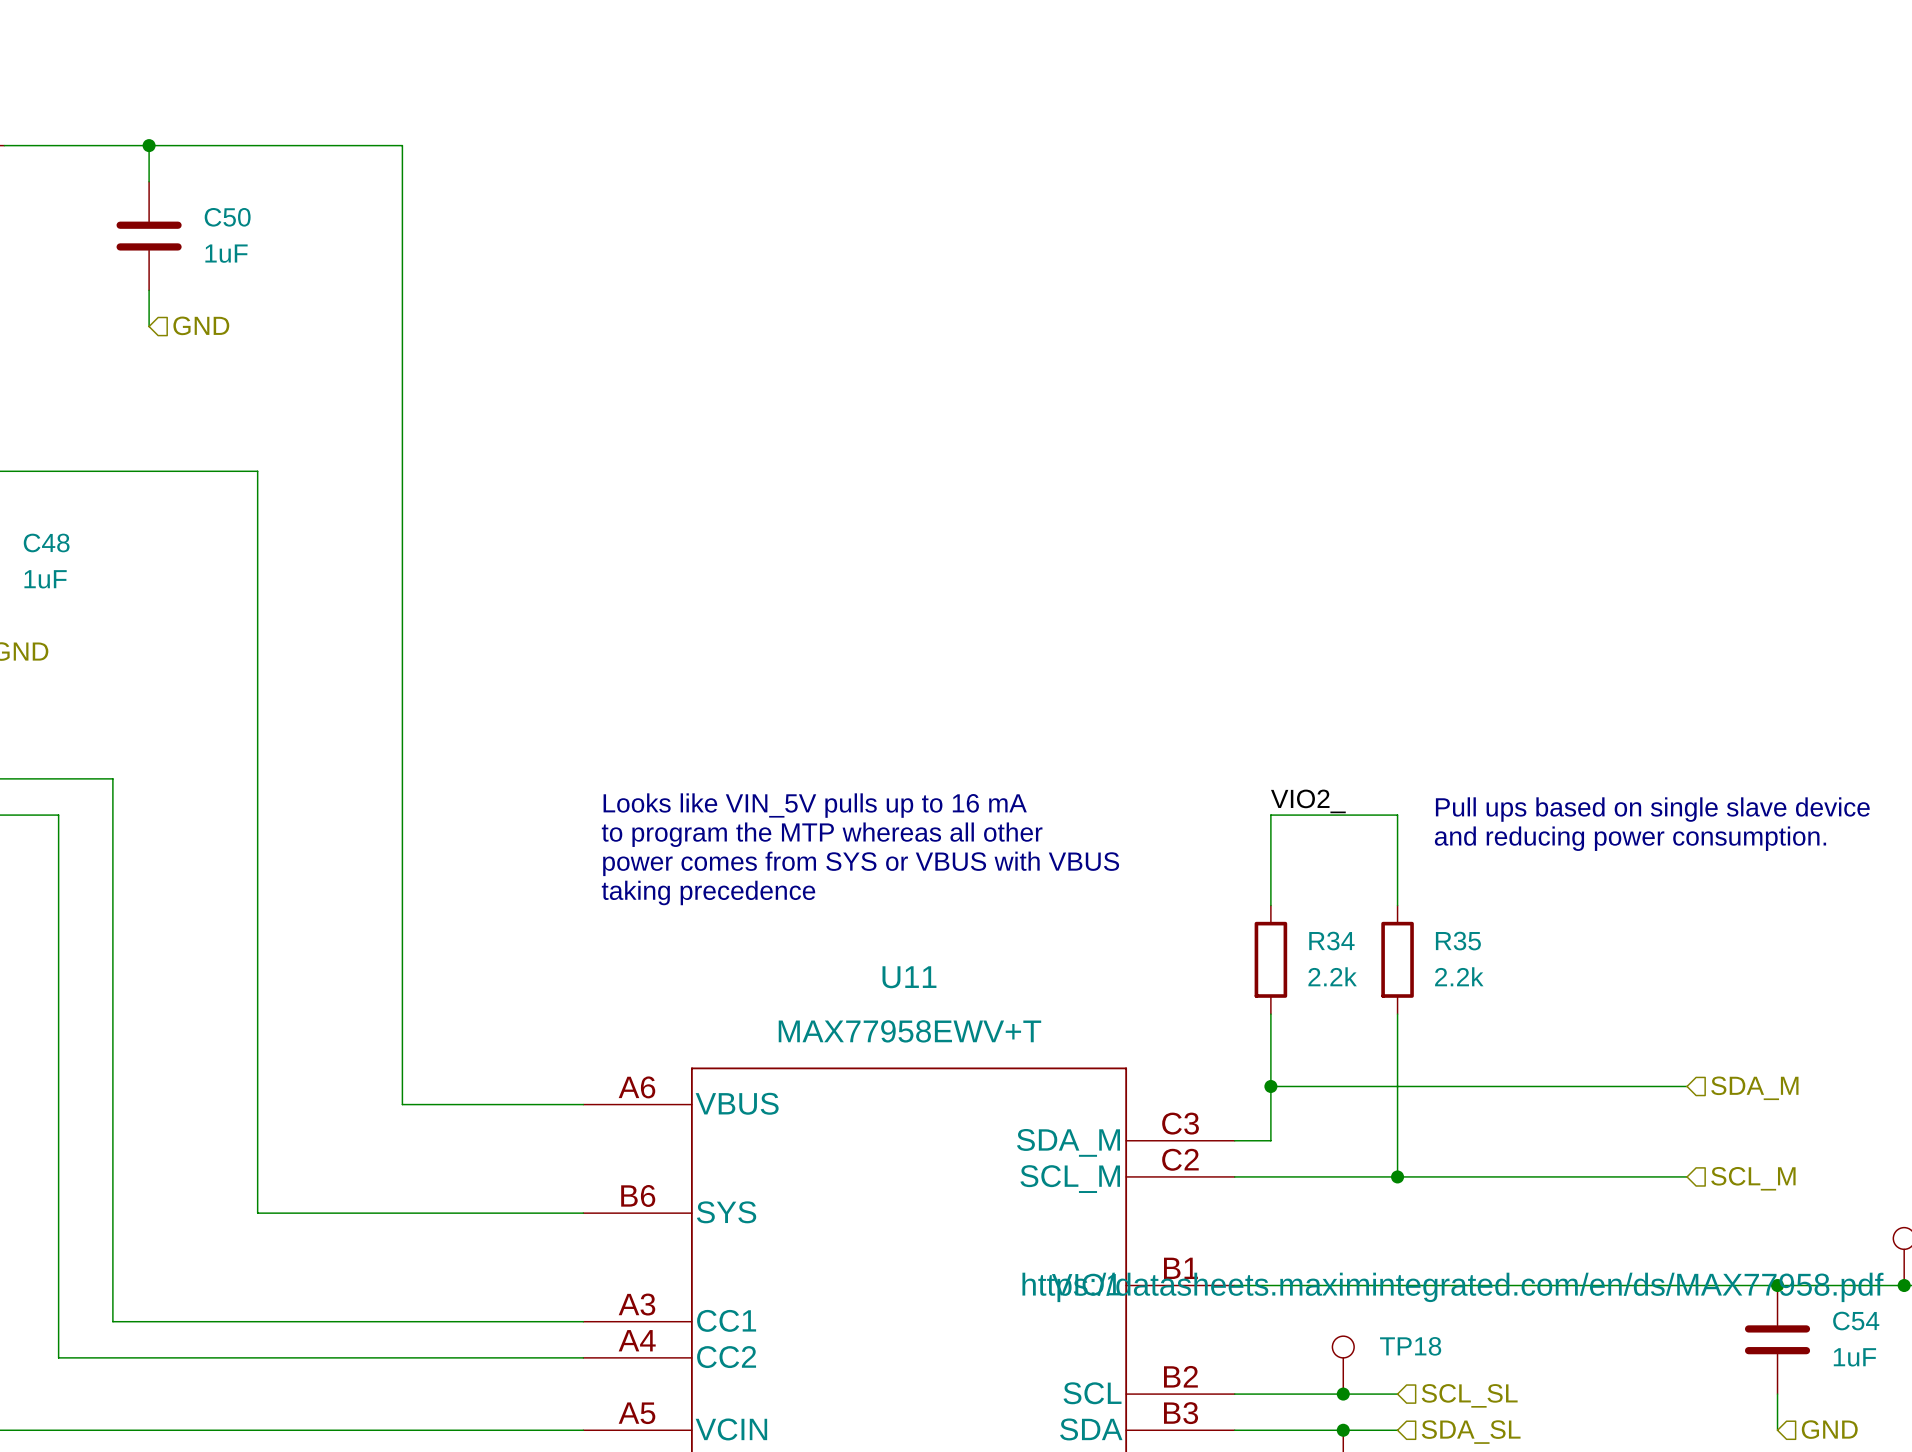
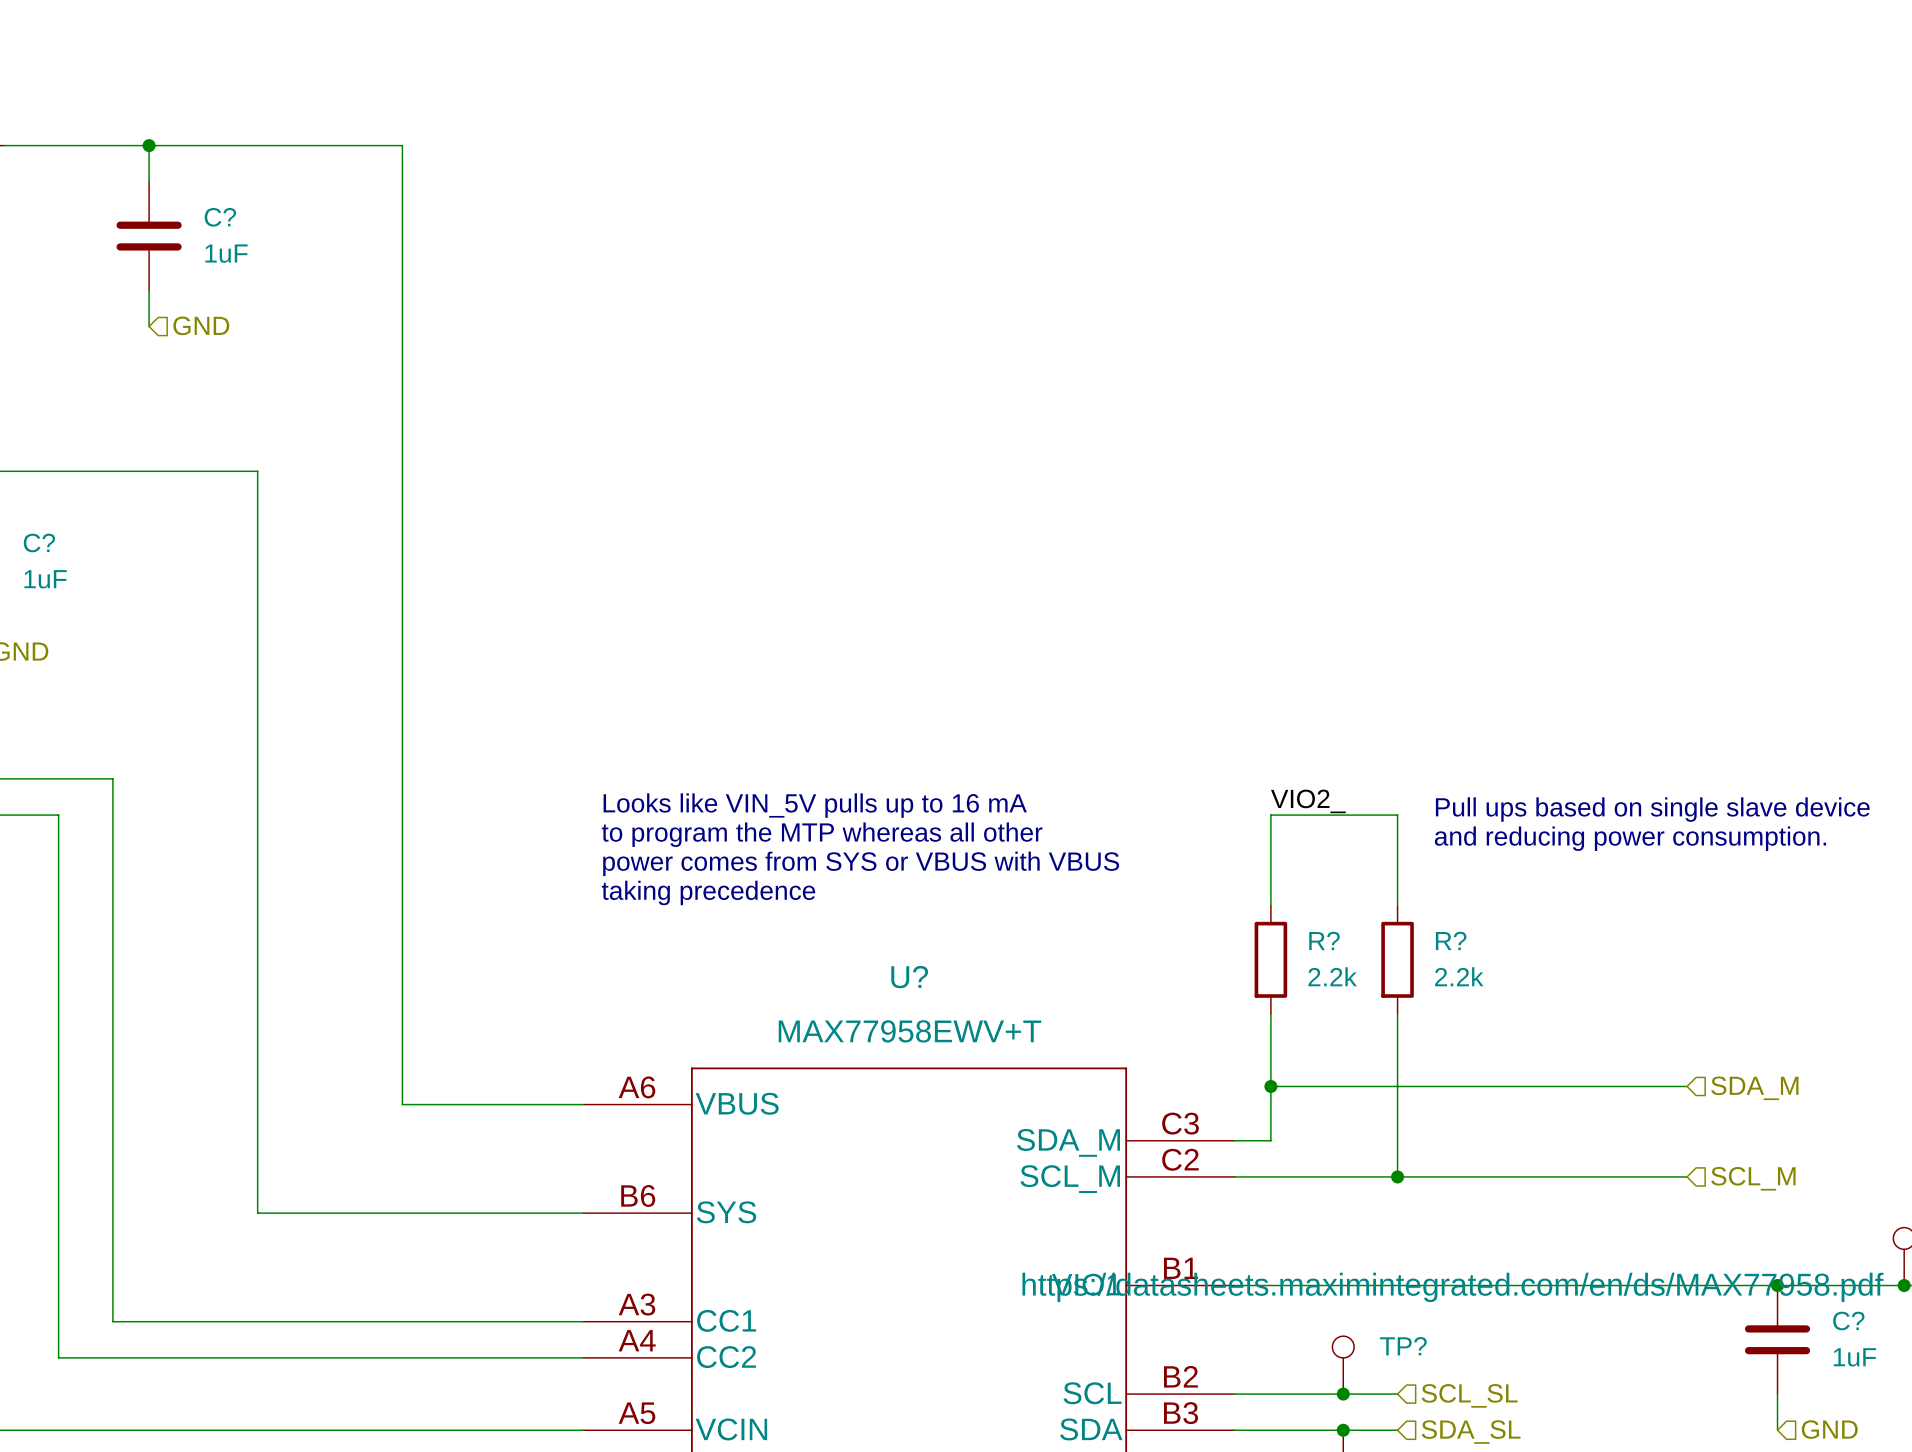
C50 name: C50 (227, 217) -> C? (220, 217)
C48 name: C48 (46, 542) -> C? (39, 542)
R34 name: R34 (1331, 941) -> R? (1324, 940)
R35 name: R35 (1458, 941) -> R? (1451, 940)
U11 name: U11 (909, 977) -> U? (909, 977)
C54 name: C54 (1856, 1321) -> C? (1848, 1321)
TP18 name: TP18 (1410, 1346) -> TP? (1403, 1346)

